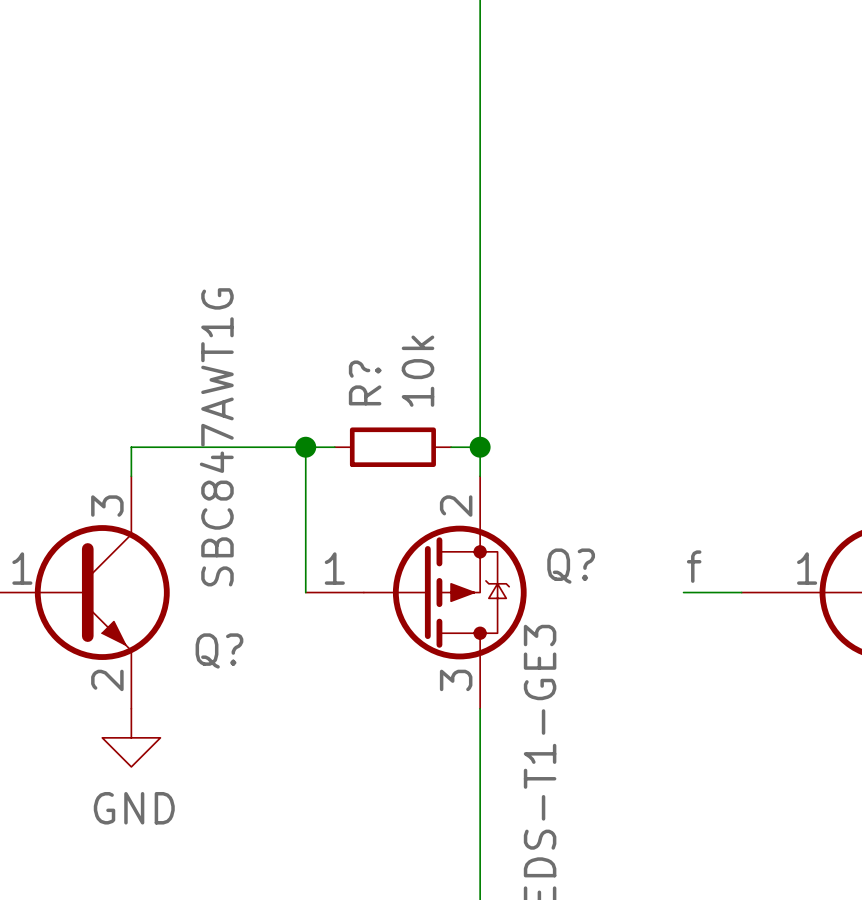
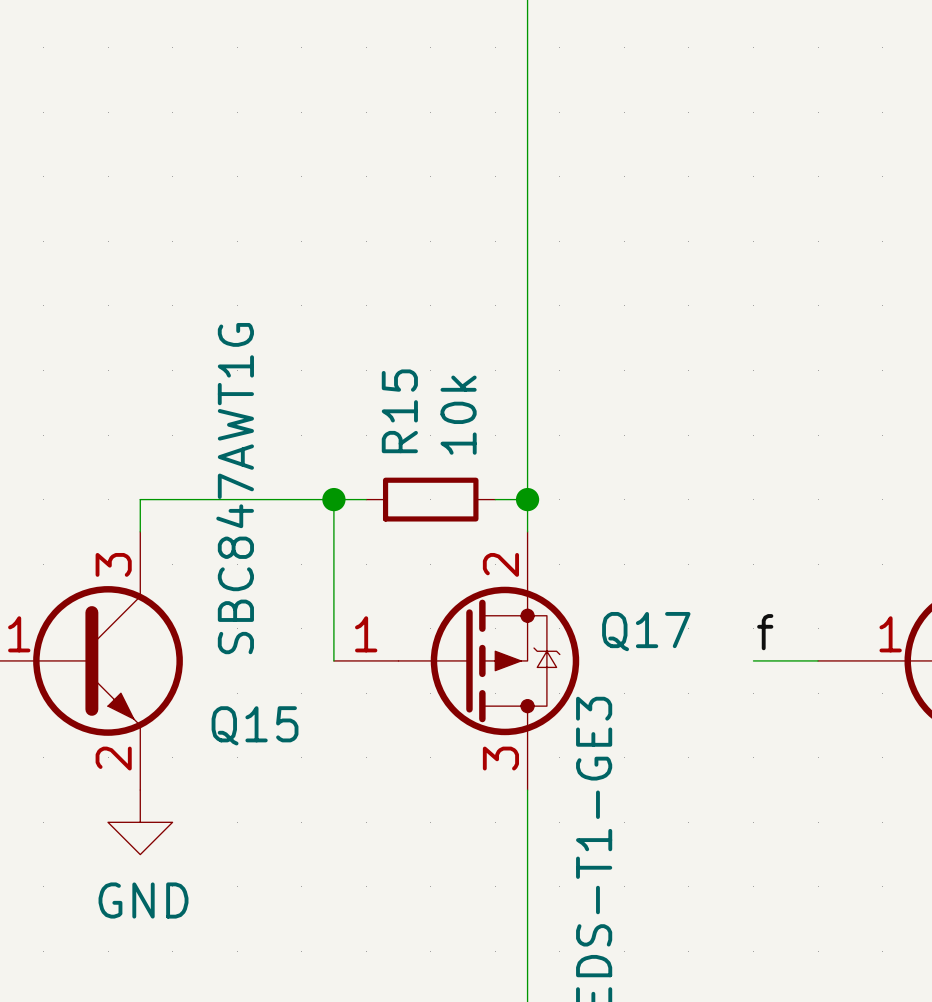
R? name: R? (365, 382) -> R15 (399, 411)
Q? name: Q? (571, 566) -> Q17 (646, 631)
Q? name: Q? (219, 650) -> Q15 (255, 725)

